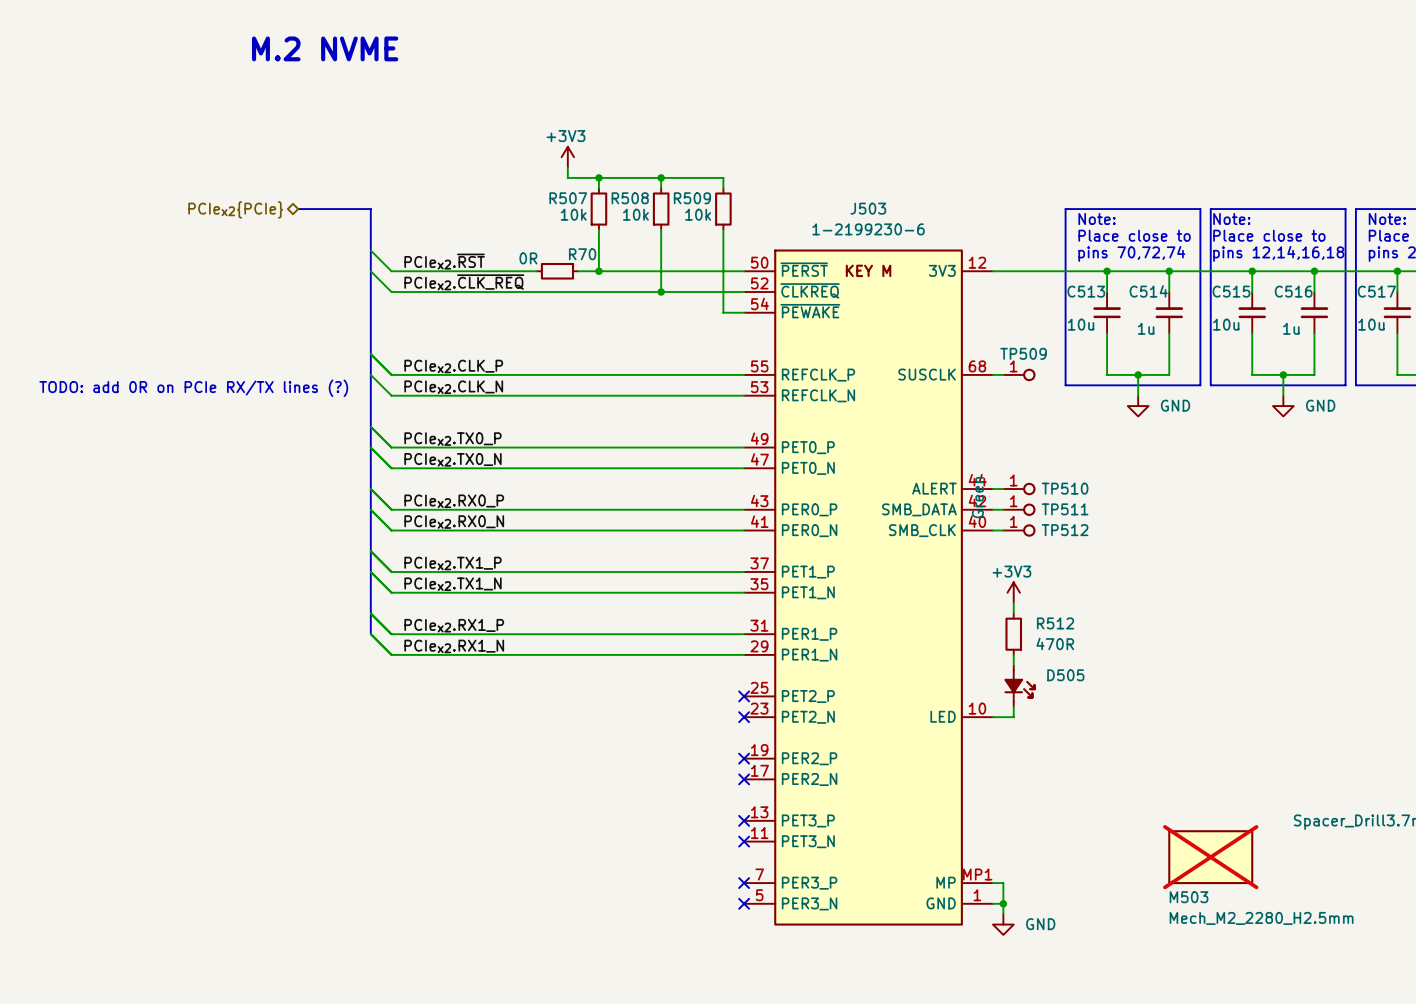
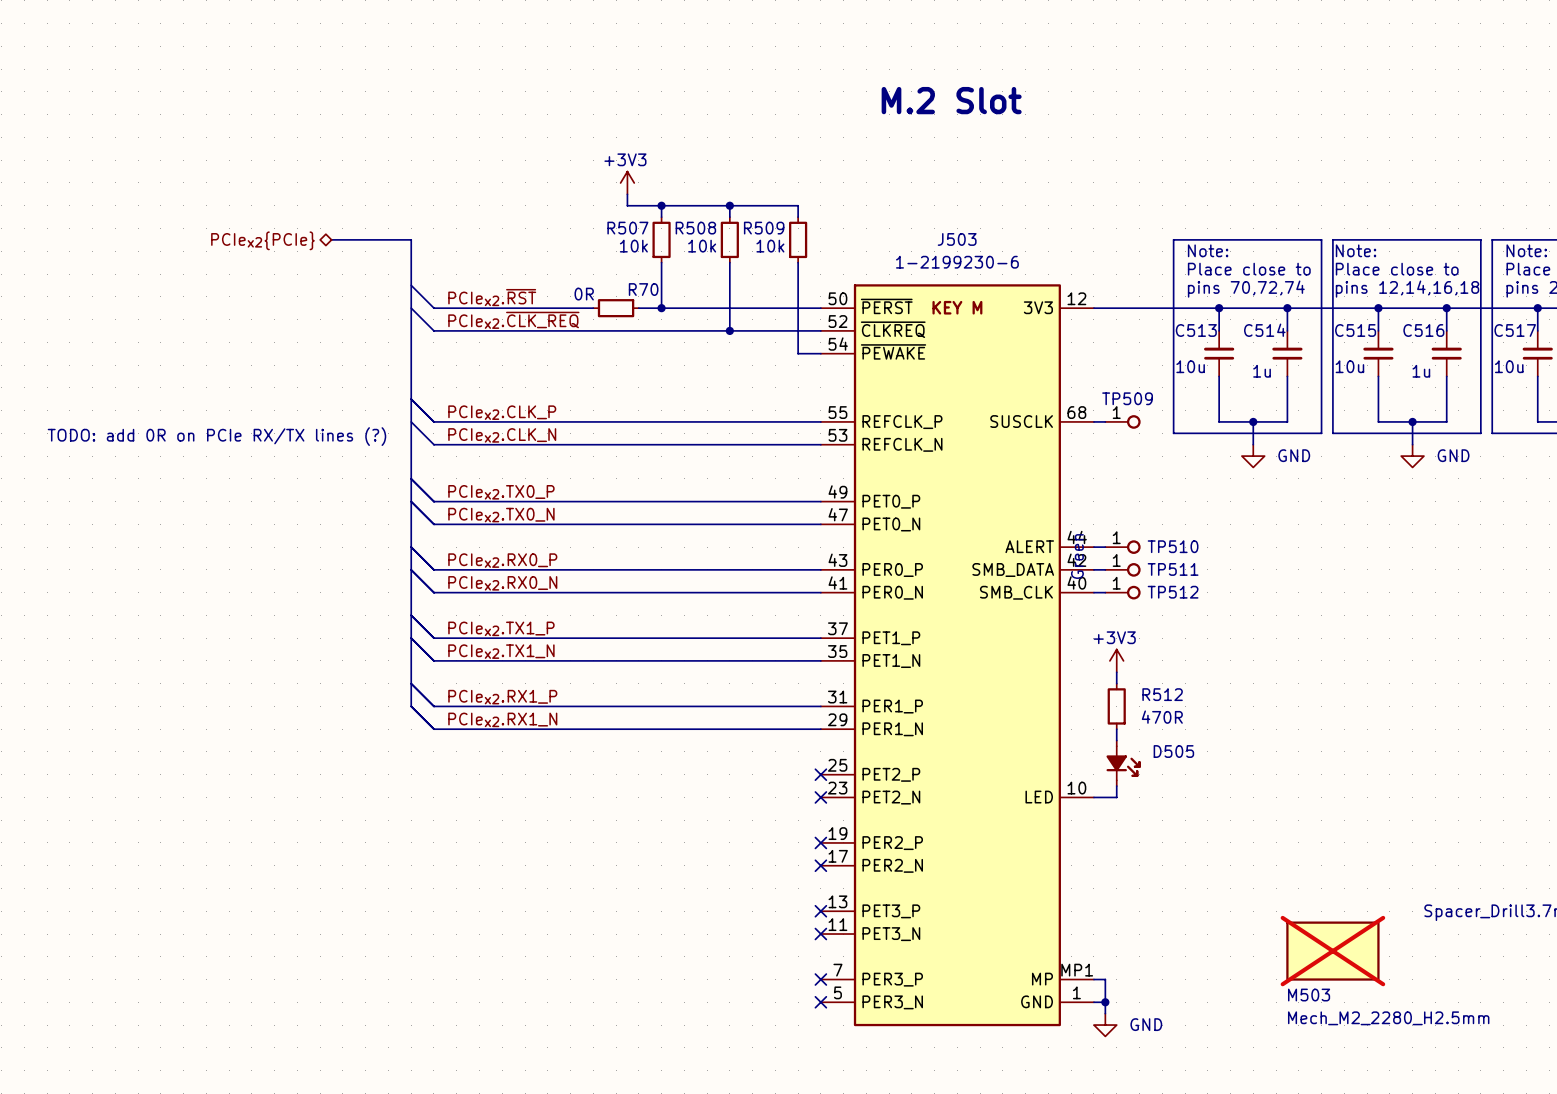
text: M.2 NVME (325, 48) -> none
text: none -> M.2 Slot (951, 100)

